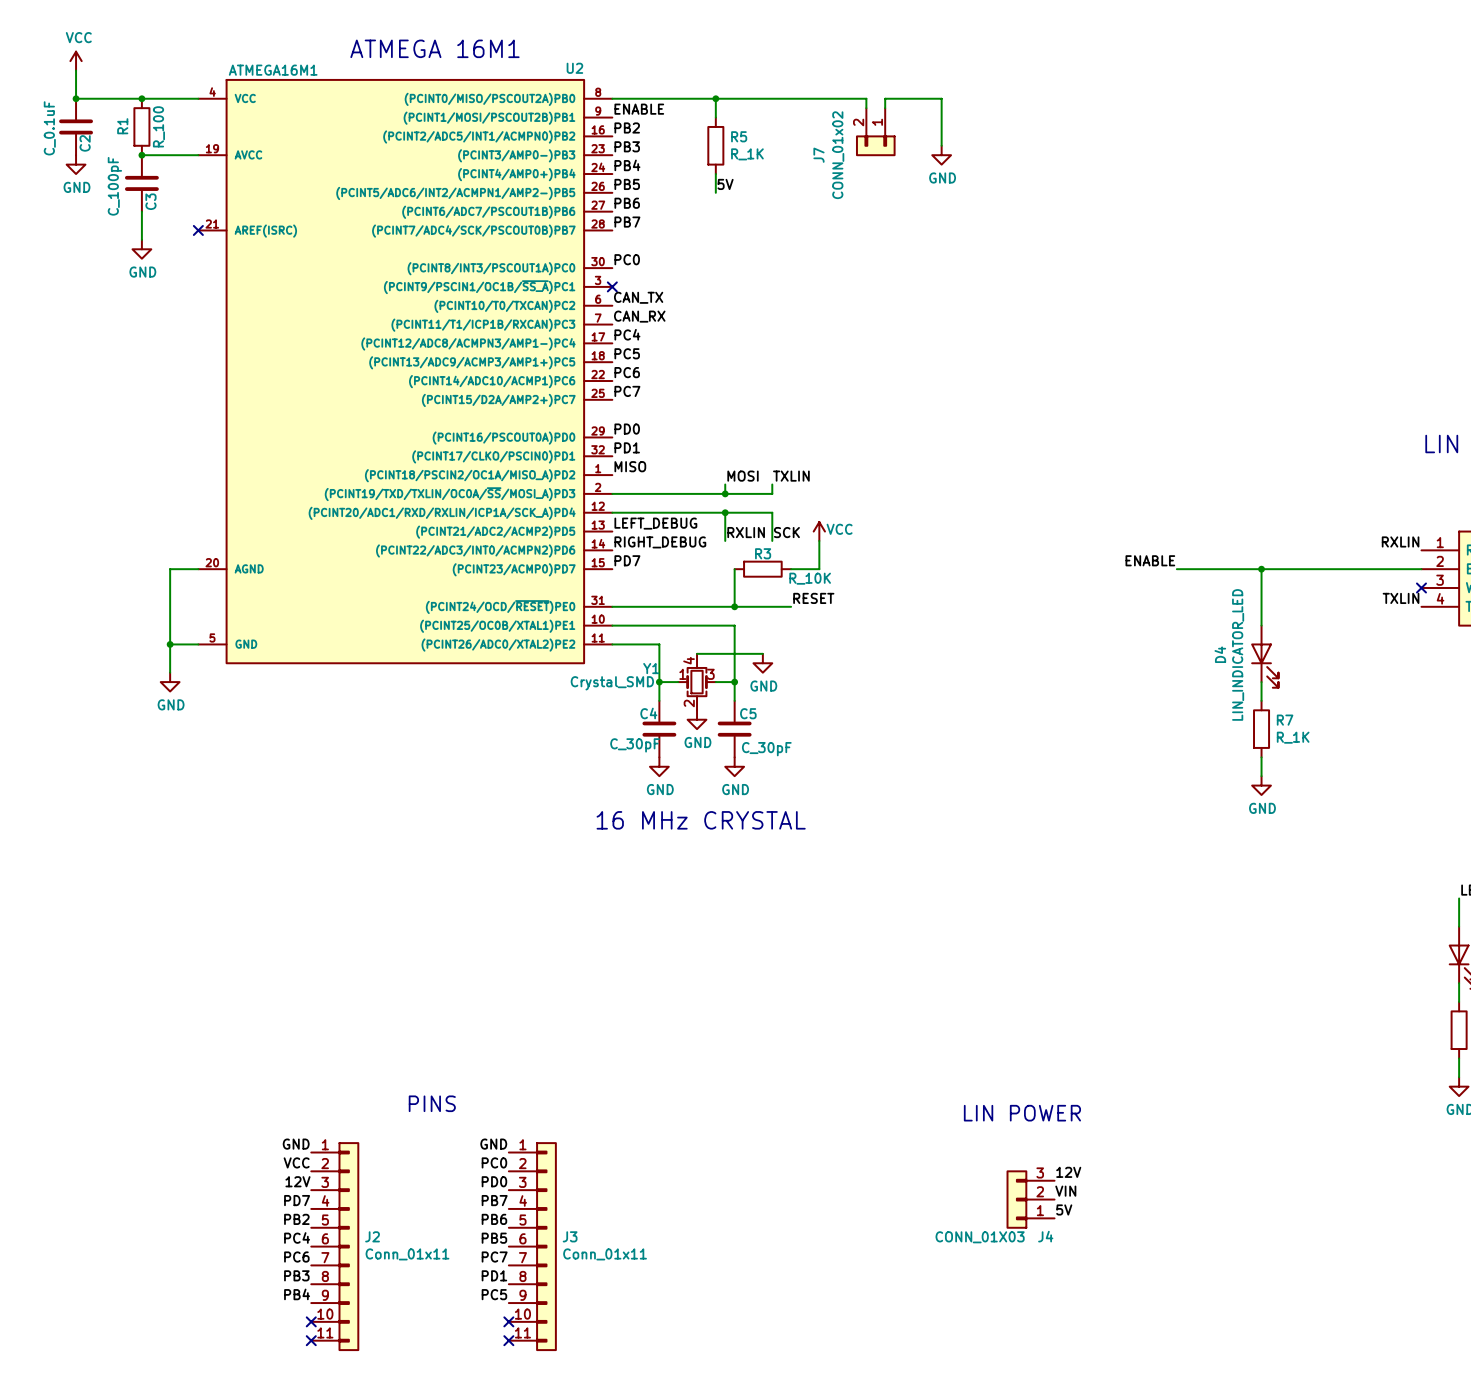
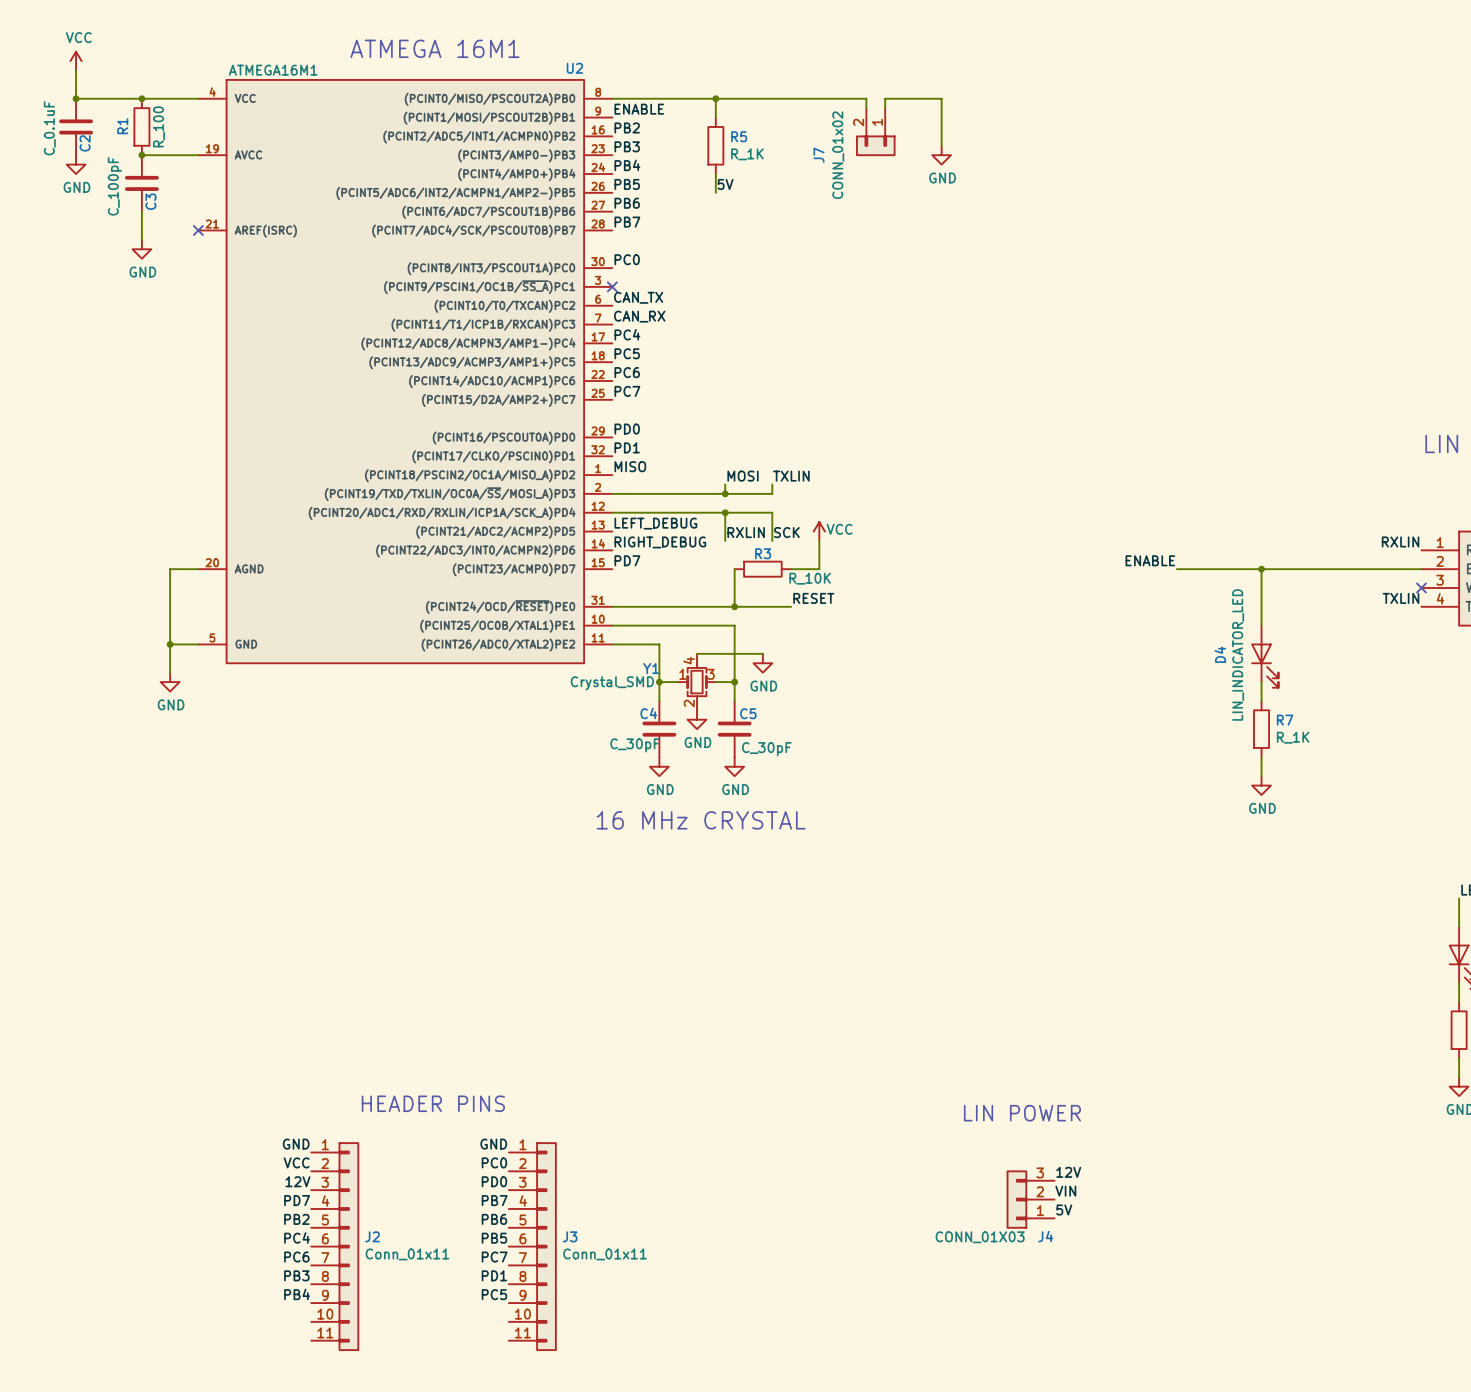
text: PINS (432, 1103) -> none
text: none -> HEADER PINS (433, 1103)
no-connect mark: (311, 1321) -> none
no-connect mark: (508, 1321) -> none
no-connect mark: (311, 1340) -> none
no-connect mark: (508, 1340) -> none

